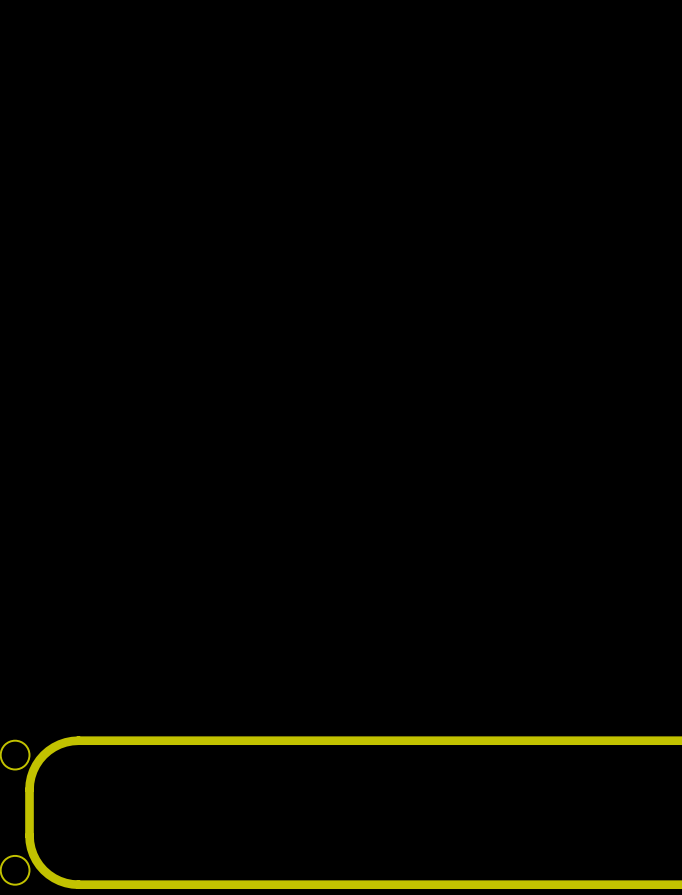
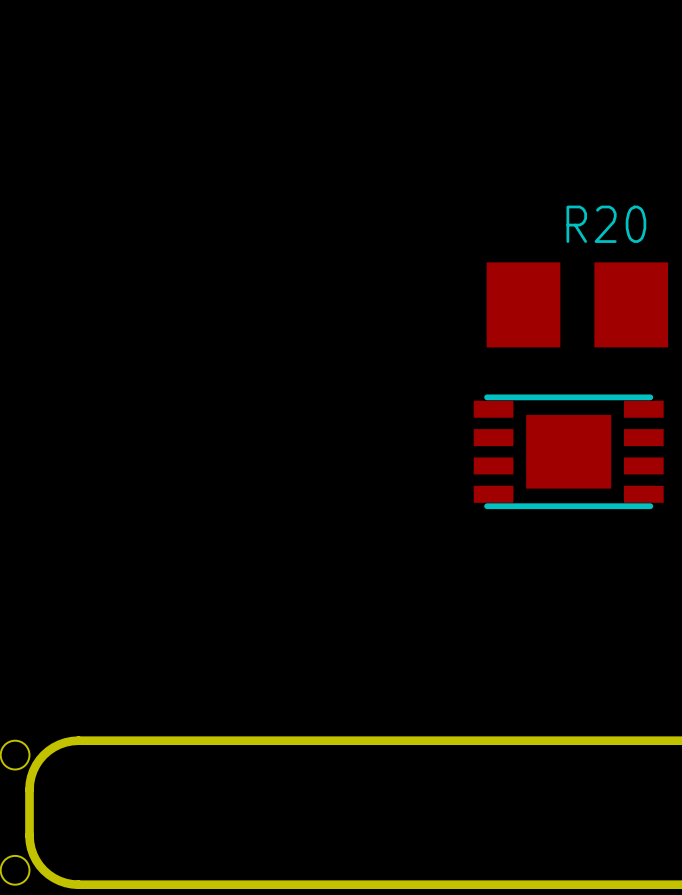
R20: none -> (577, 304)
part: none -> (568, 451)

